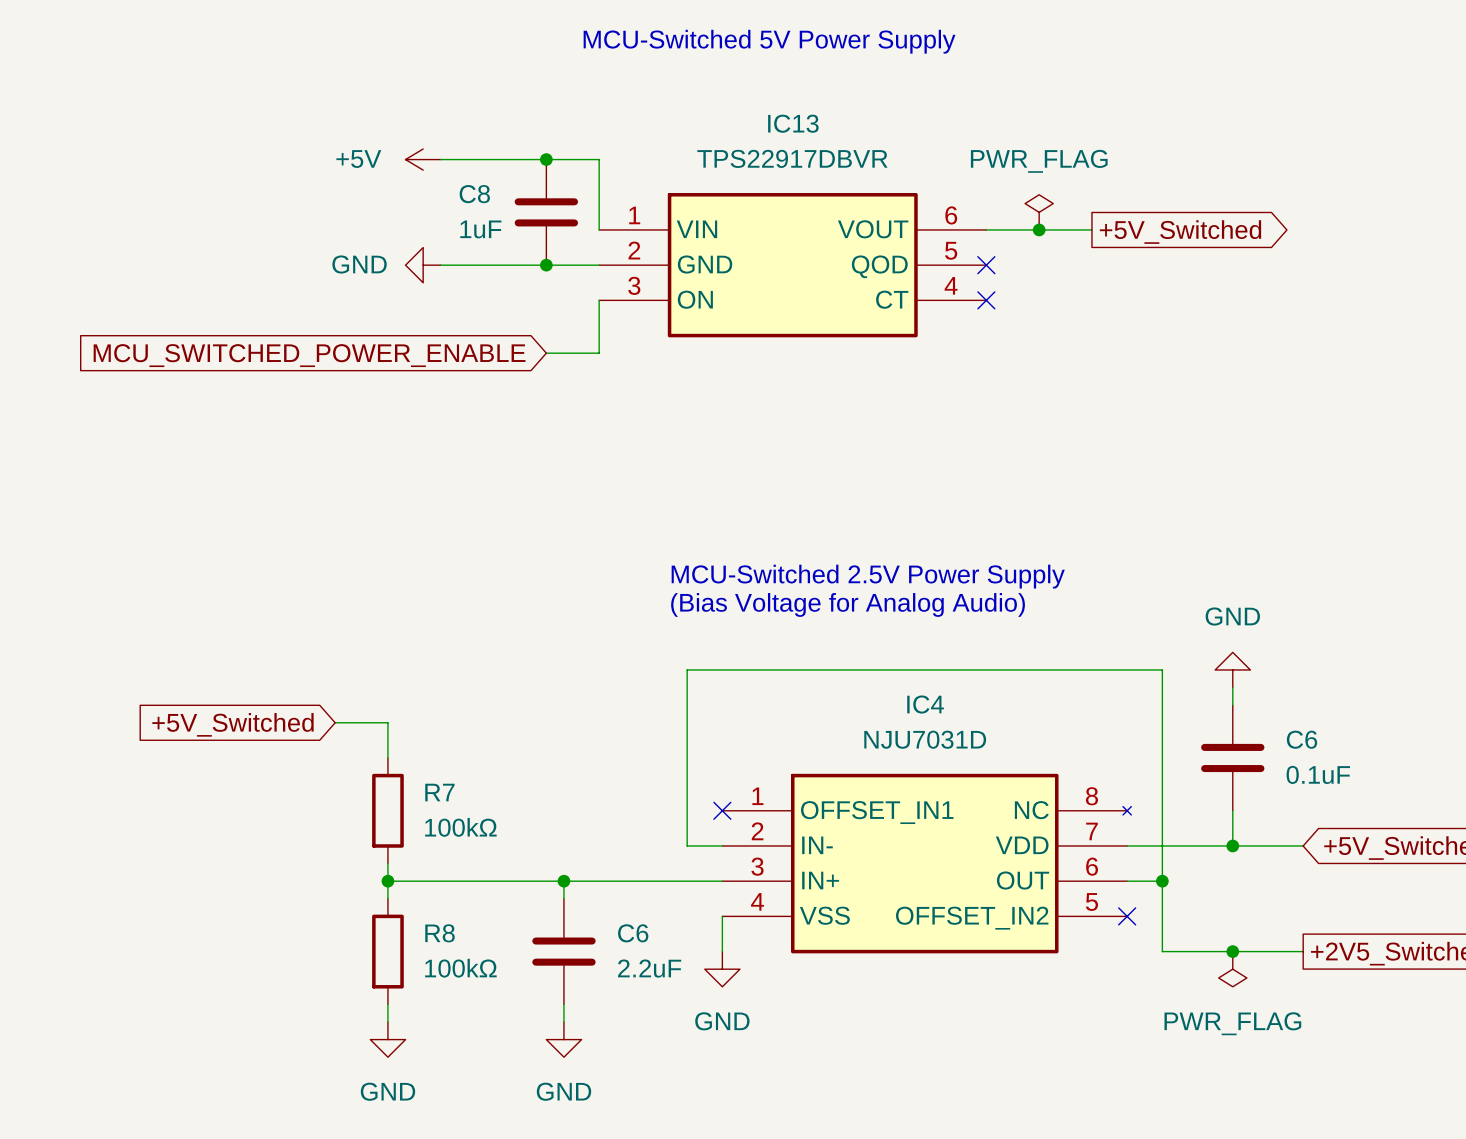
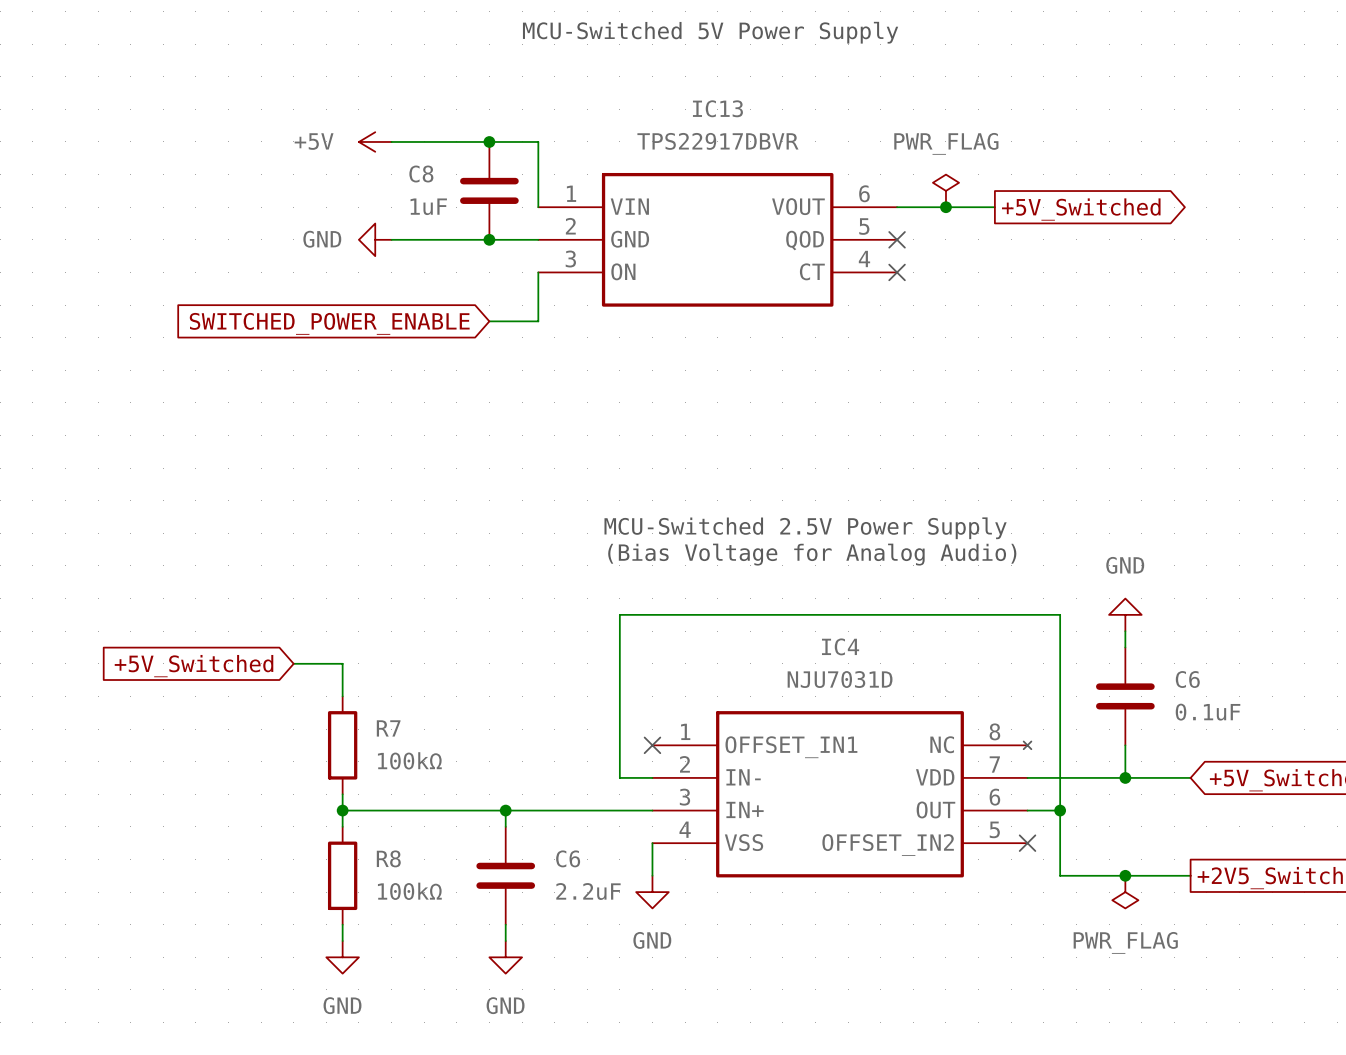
global label: MCU_SWITCHED_POWER_ENABLE (309, 355) -> SWITCHED_POWER_ENABLE (329, 323)

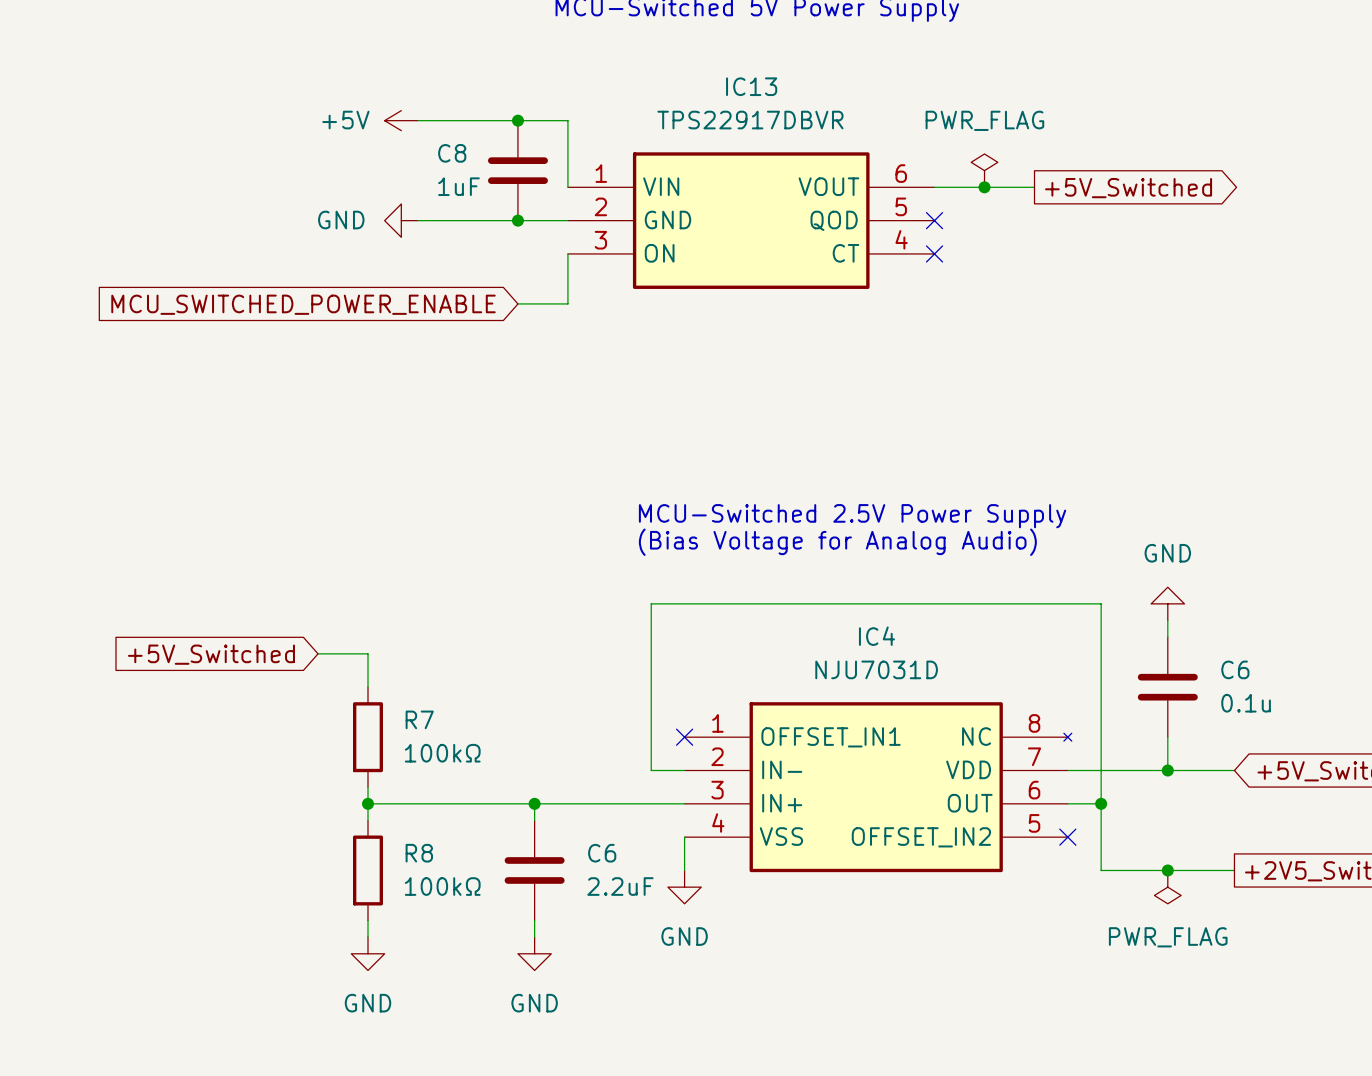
global label: SWITCHED_POWER_ENABLE (329, 323) -> MCU_SWITCHED_POWER_ENABLE (303, 304)
C6 value: 0.1uF (1208, 712) -> 0.1u (1246, 703)

